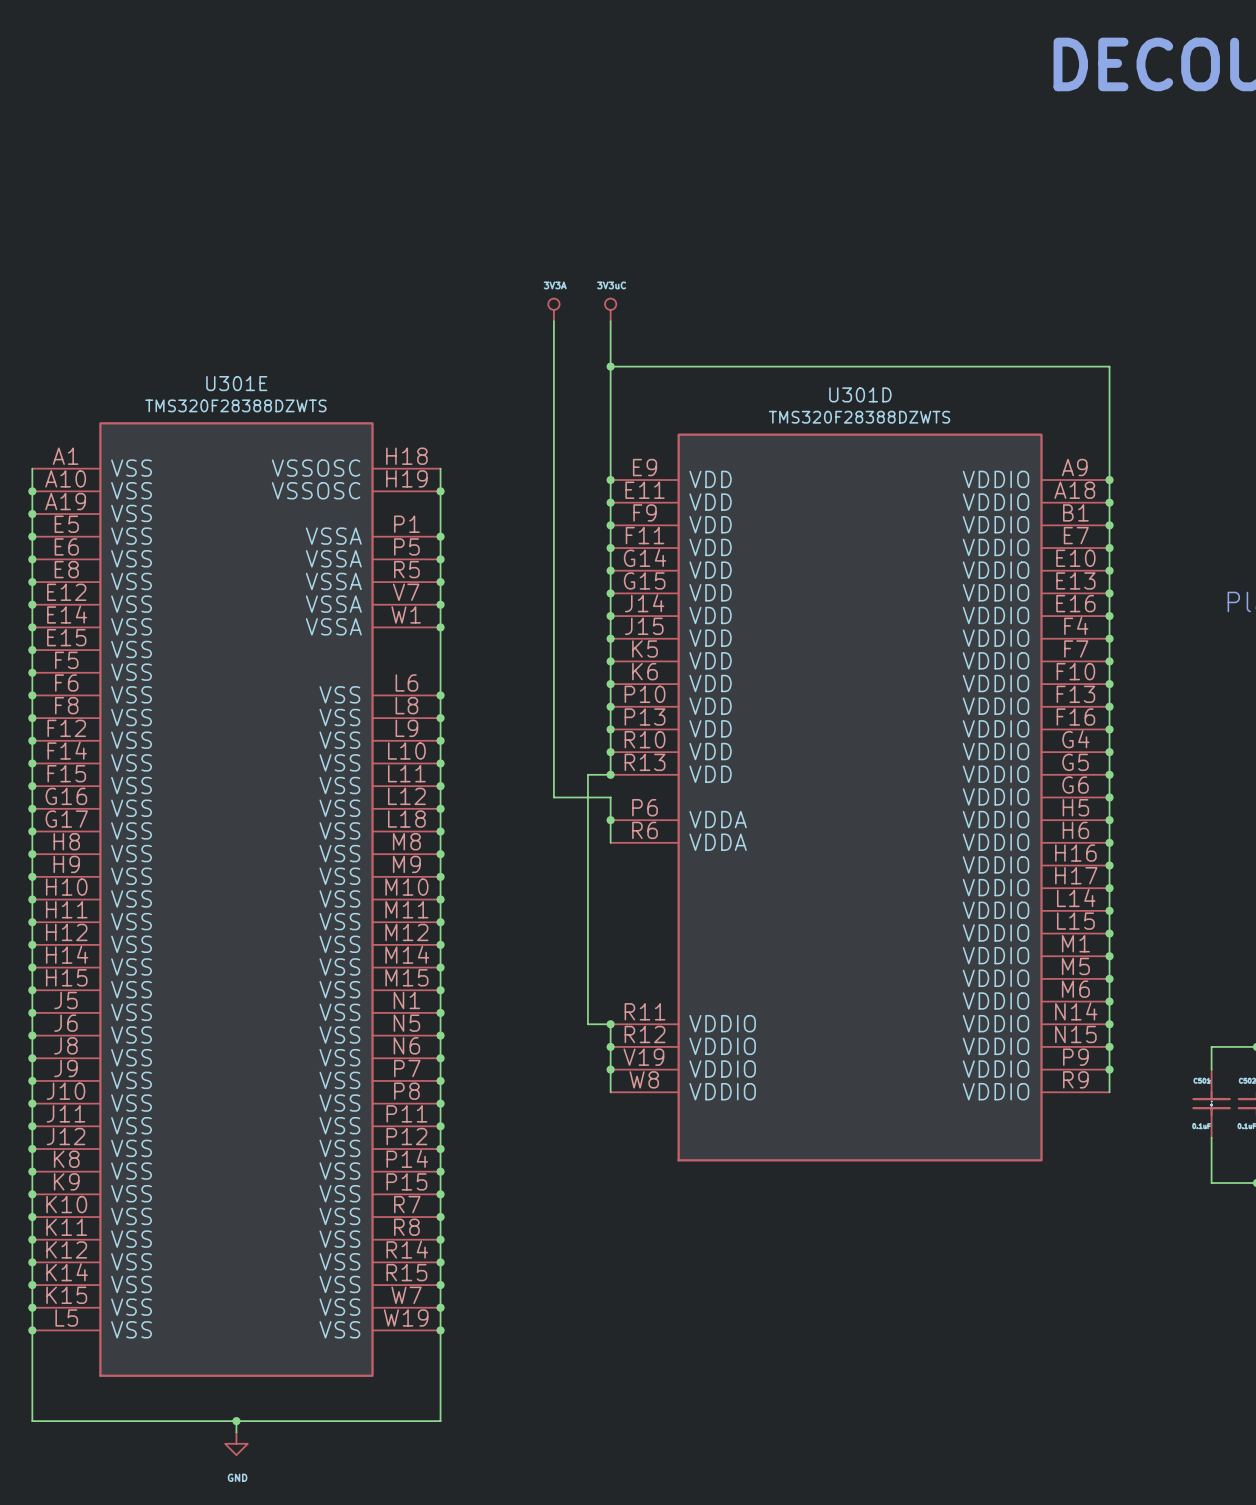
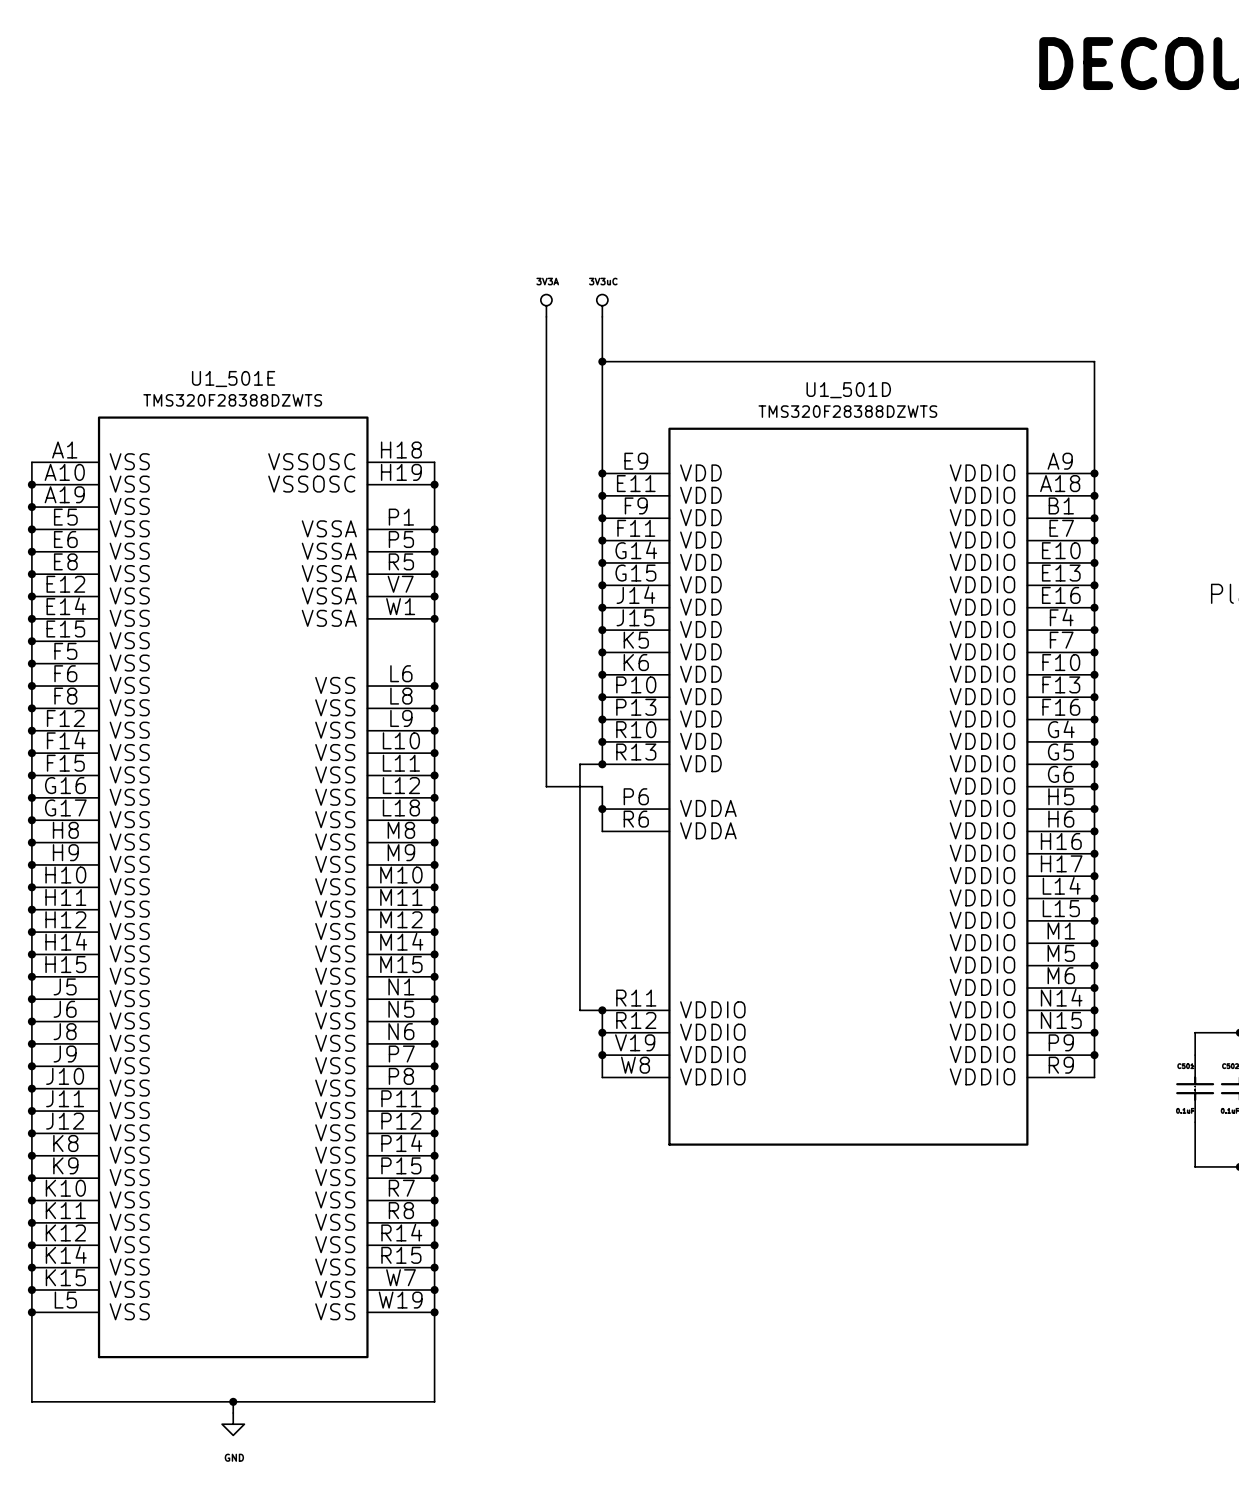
U301E name: U301E (236, 383) -> U1_501E (233, 379)
U301D name: U301D (860, 394) -> U1_501D (848, 390)

